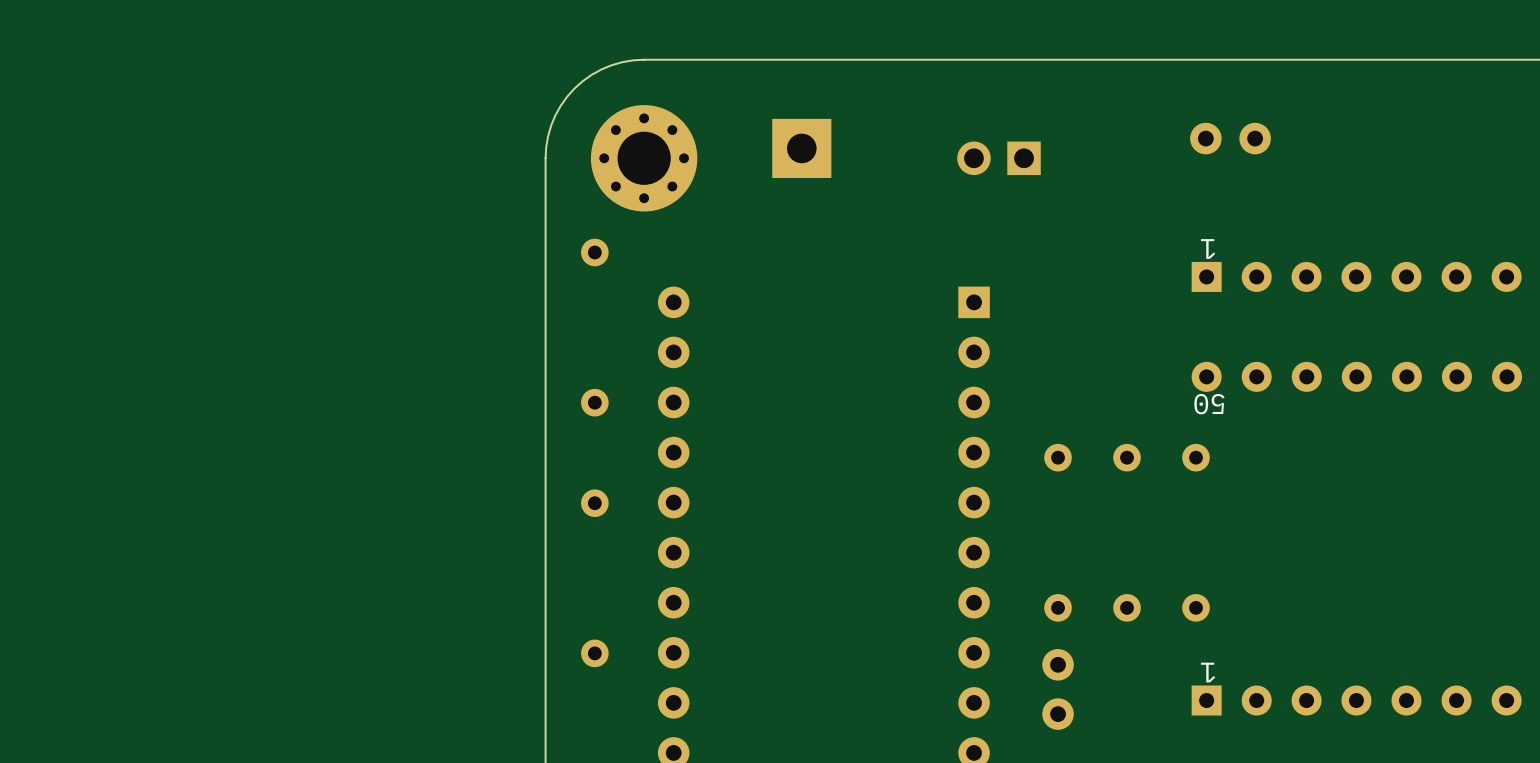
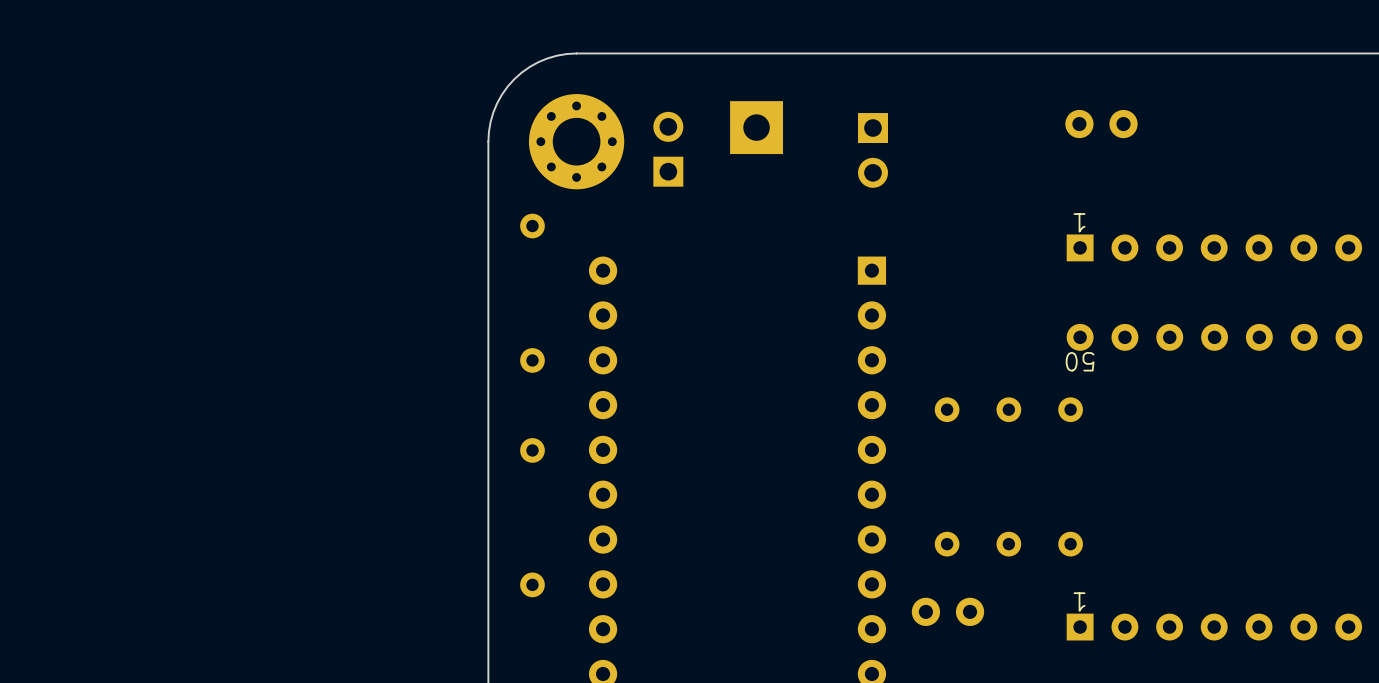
part position: (801, 148) -> (756, 127)
part rotation: 0° (999, 158) -> 90° counterclockwise (873, 150)
part: none -> (668, 149)
part rotation: 0° (1058, 689) -> 90° clockwise (947, 611)

